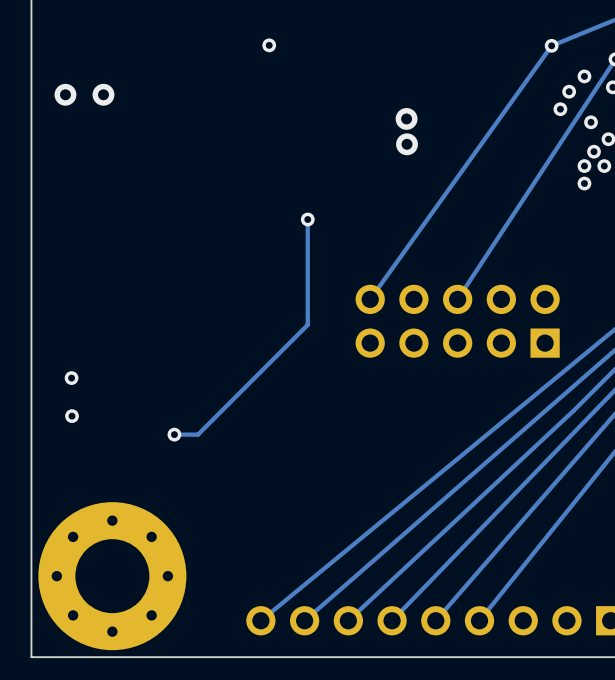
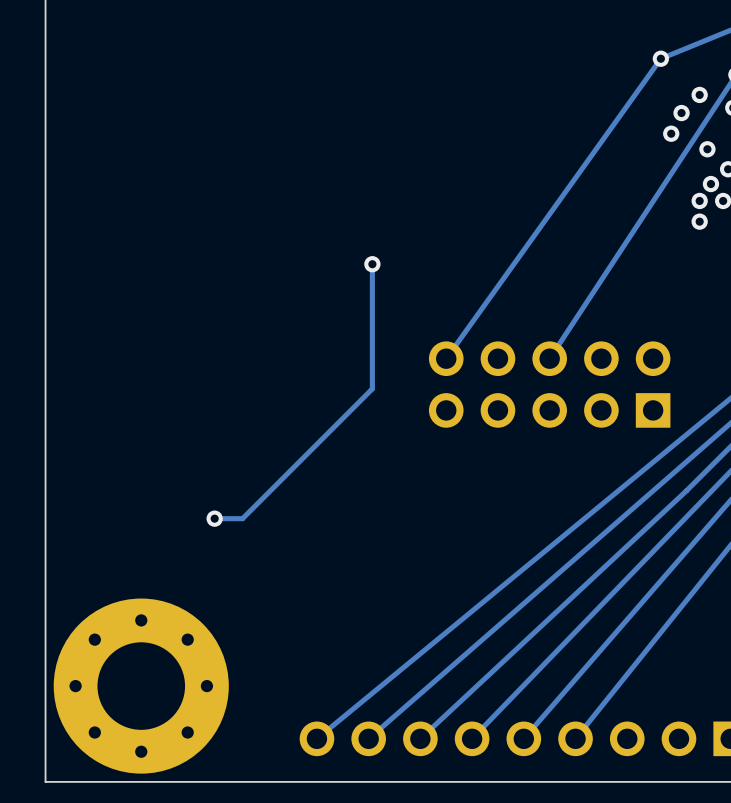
via: (269, 45) -> none
via: (65, 94) -> none
via: (103, 94) -> none
via: (406, 118) -> none
via: (407, 144) -> none
via: (71, 378) -> none
via: (72, 416) -> none

